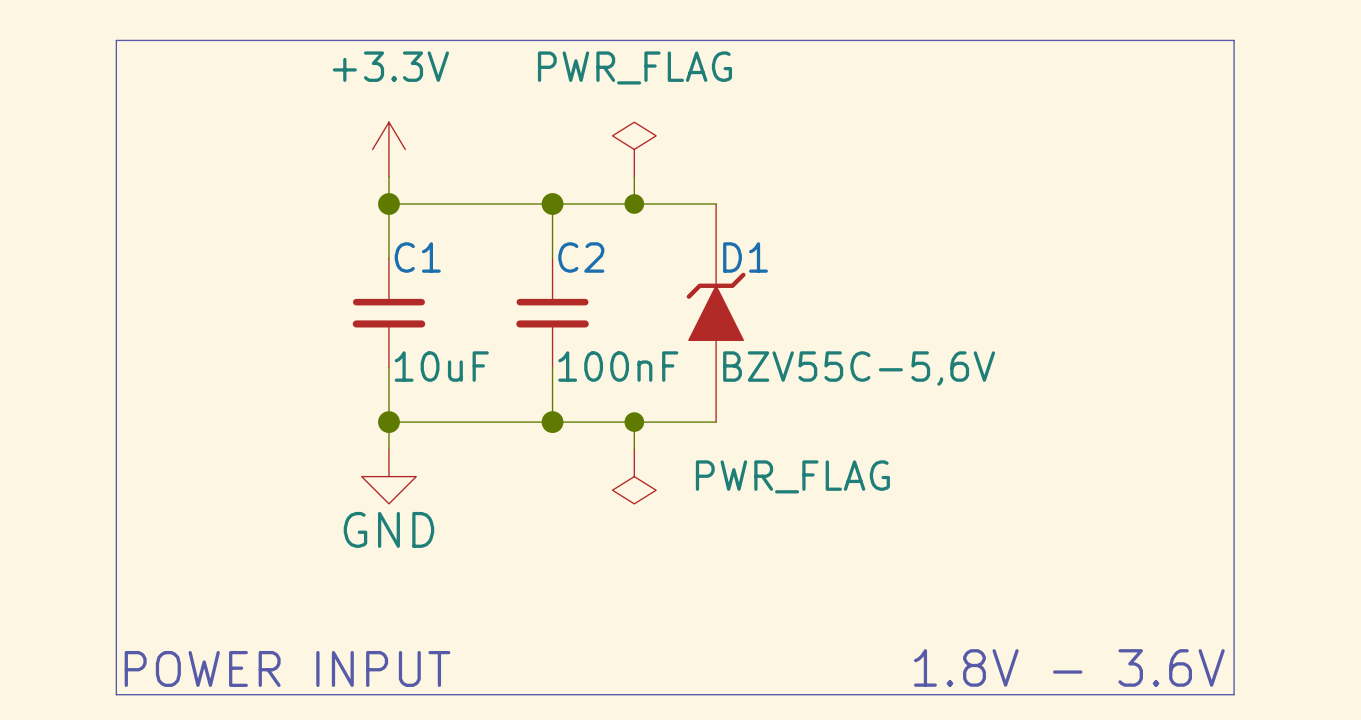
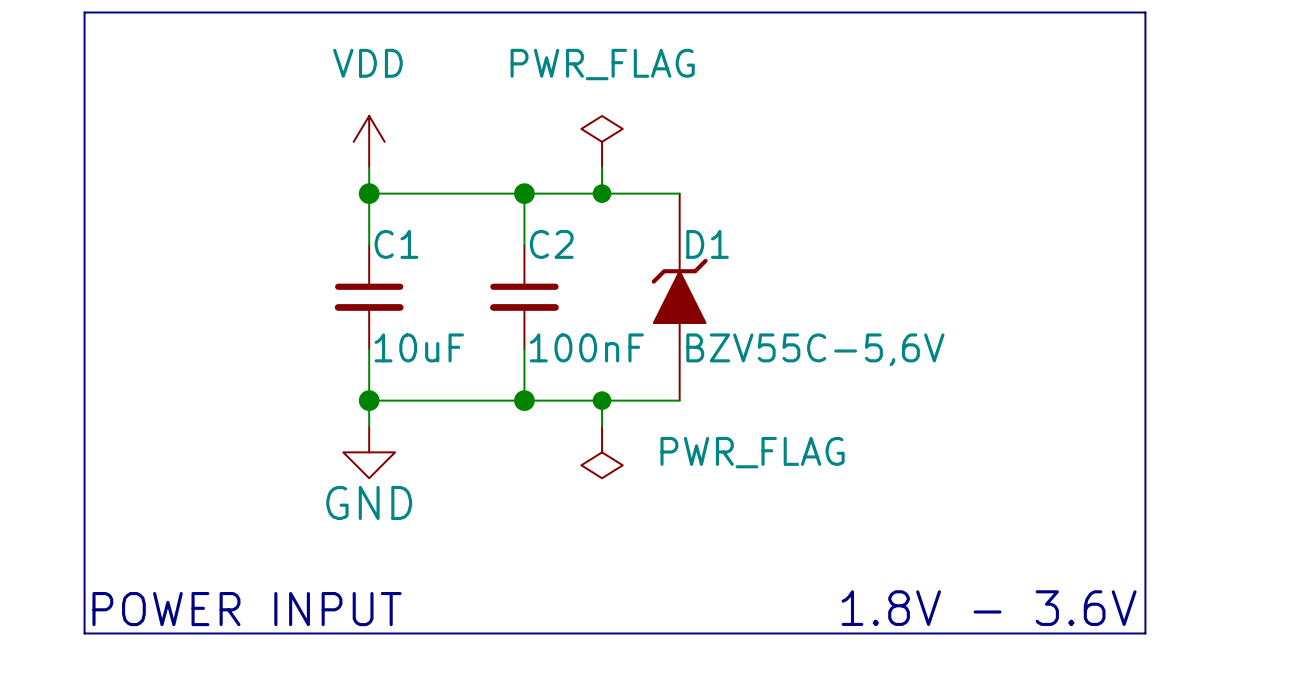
line: (116, 40) (1234, 40) (1234, 694) (116, 694) (116, 40) -> (84, 12) (84, 633) (1145, 633) (1145, 12) (84, 12)
power symbol: +3.3V (388, 149) -> VDD (369, 141)
text position: 1.8V - 3.6V (1069, 667) -> 1.8V - 3.6V (989, 608)
text position: POWER INPUT (287, 668) -> POWER INPUT (247, 609)

